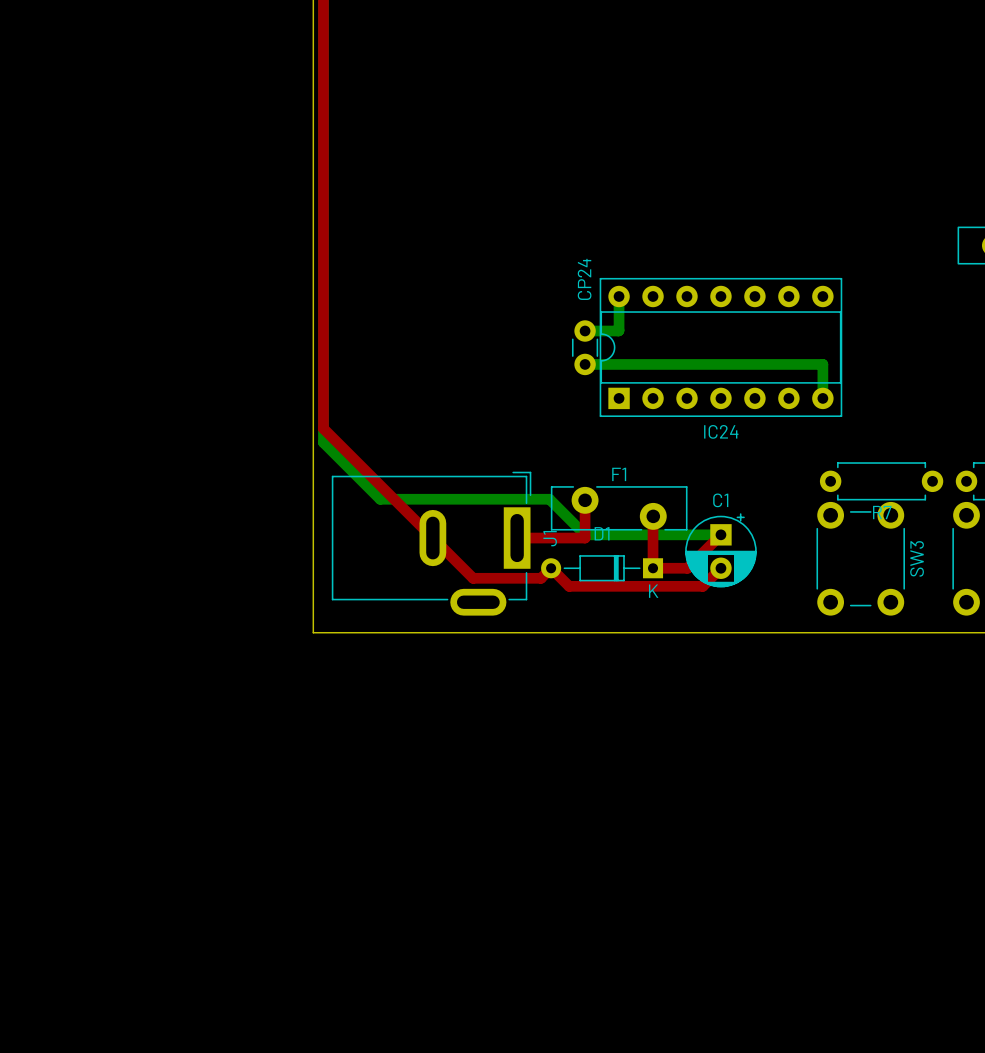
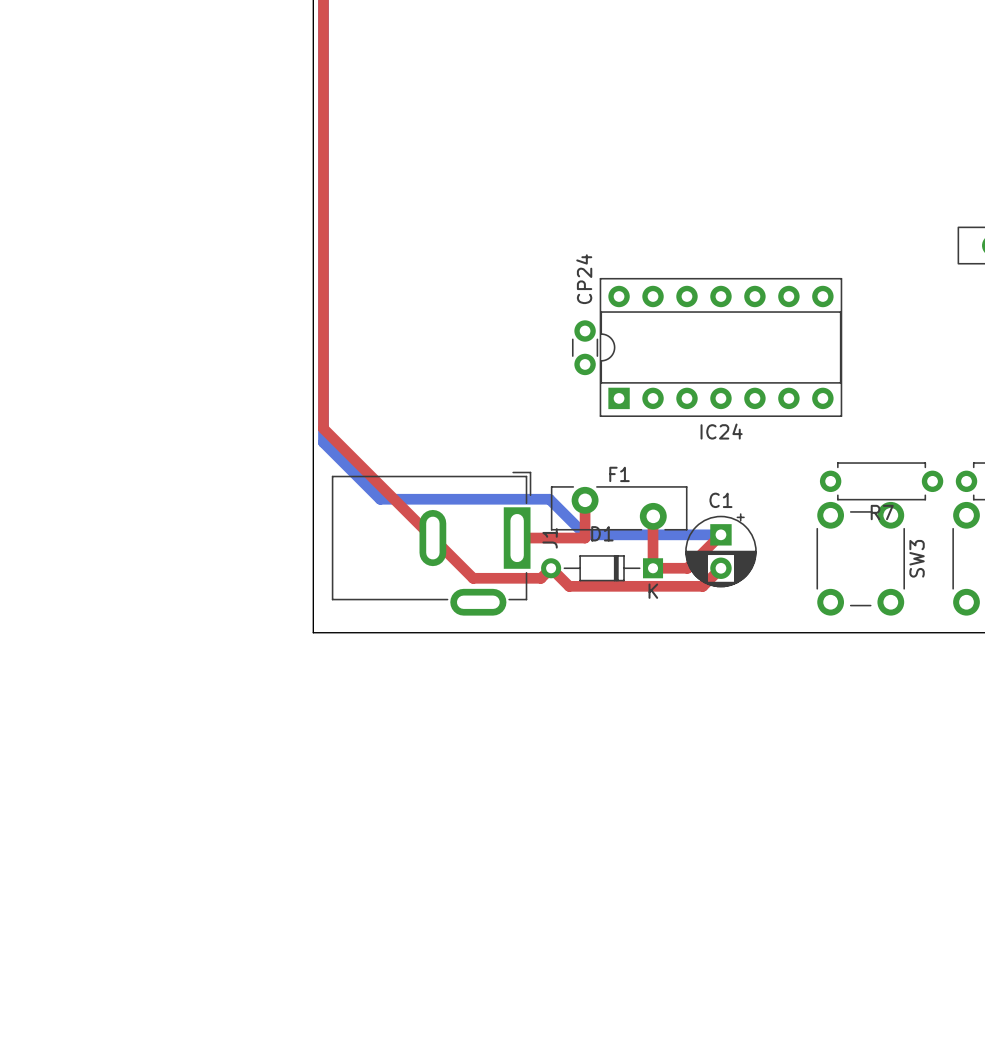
bottom track: (619, 296) (619, 330) (585, 331) -> none
bottom track: (585, 364) (822, 364) (822, 398) -> none

